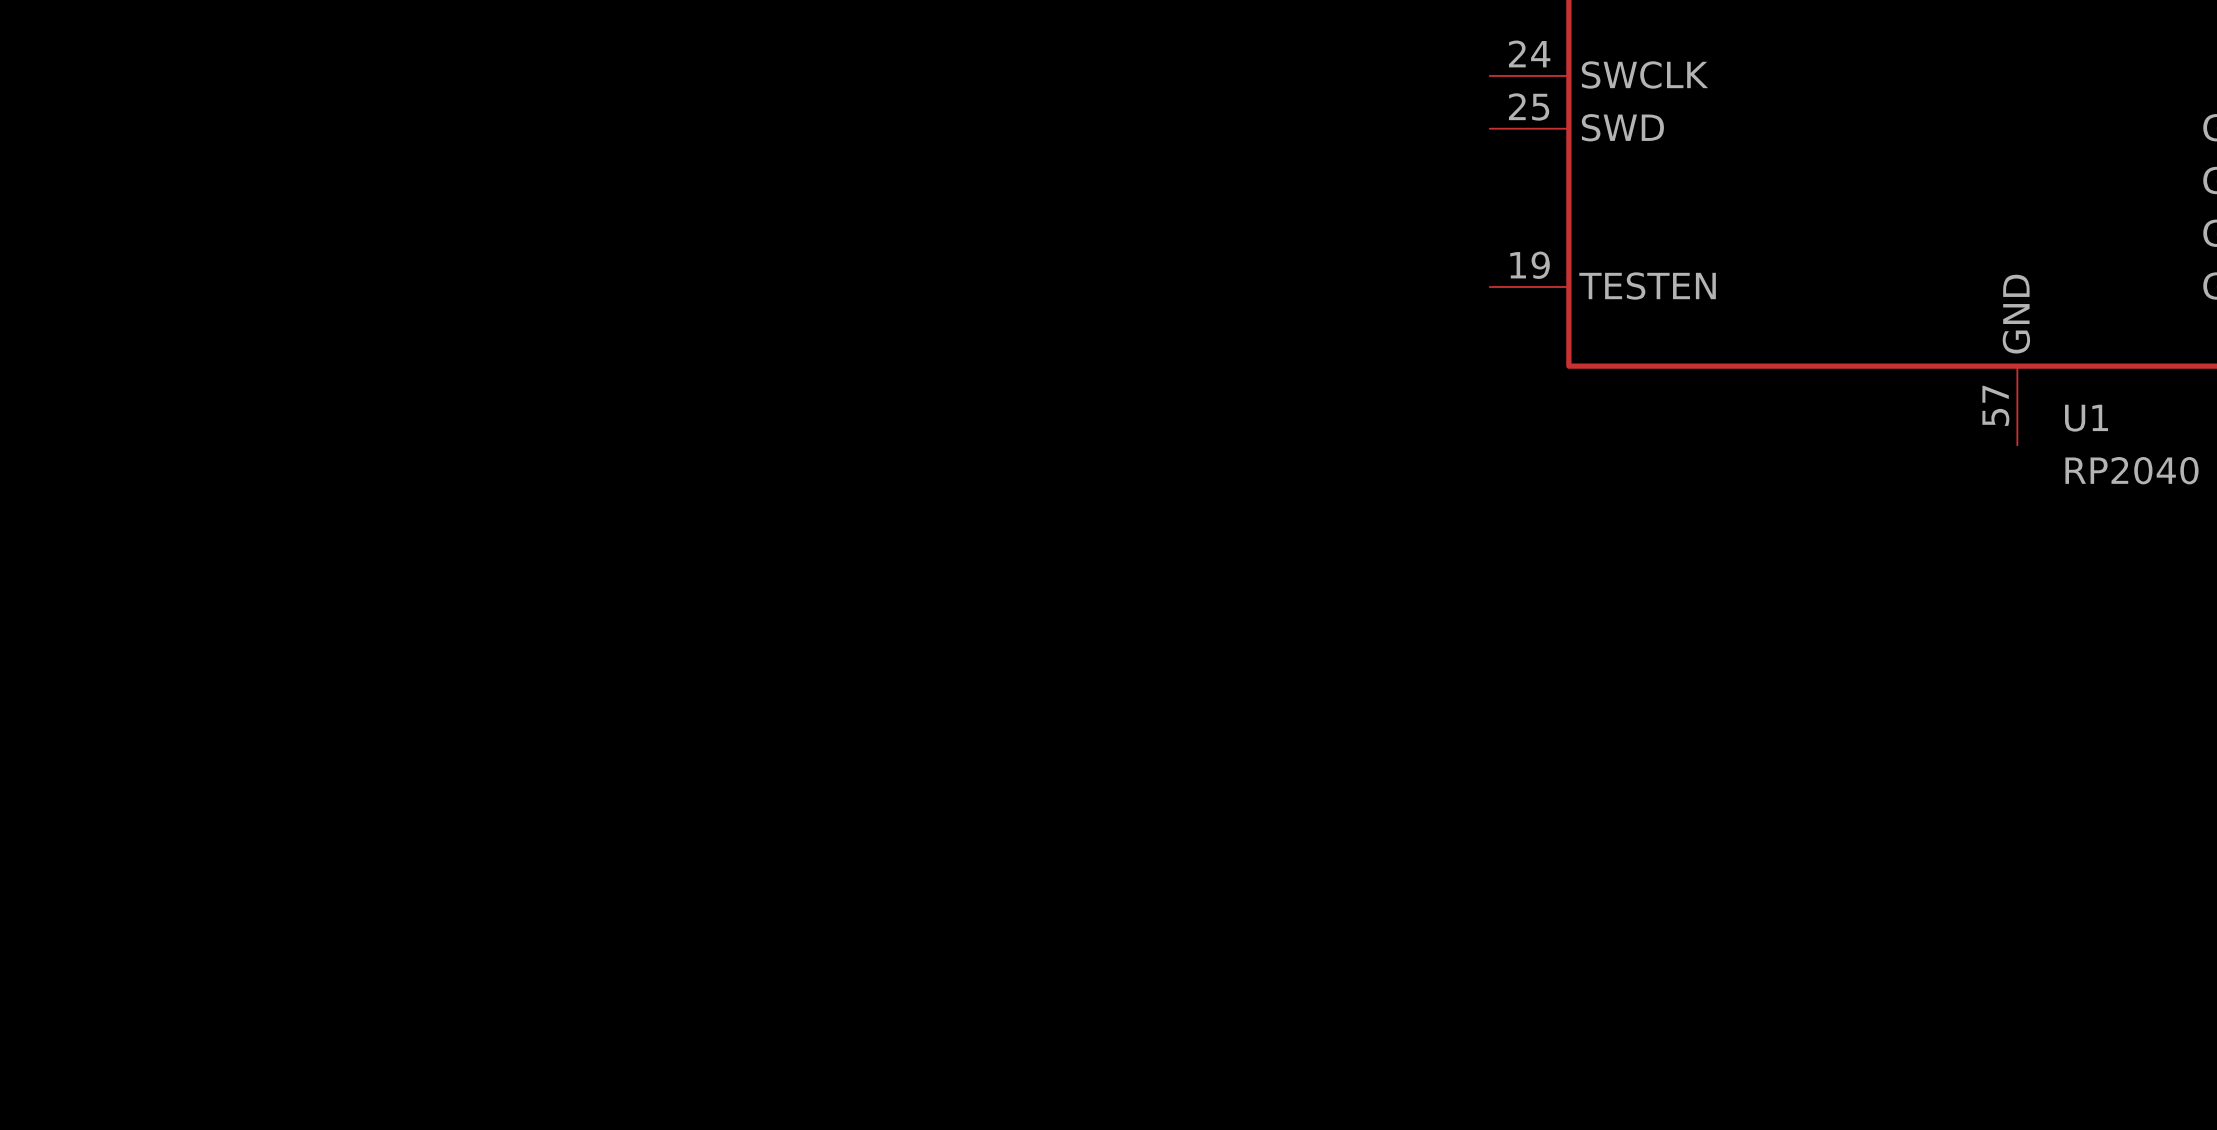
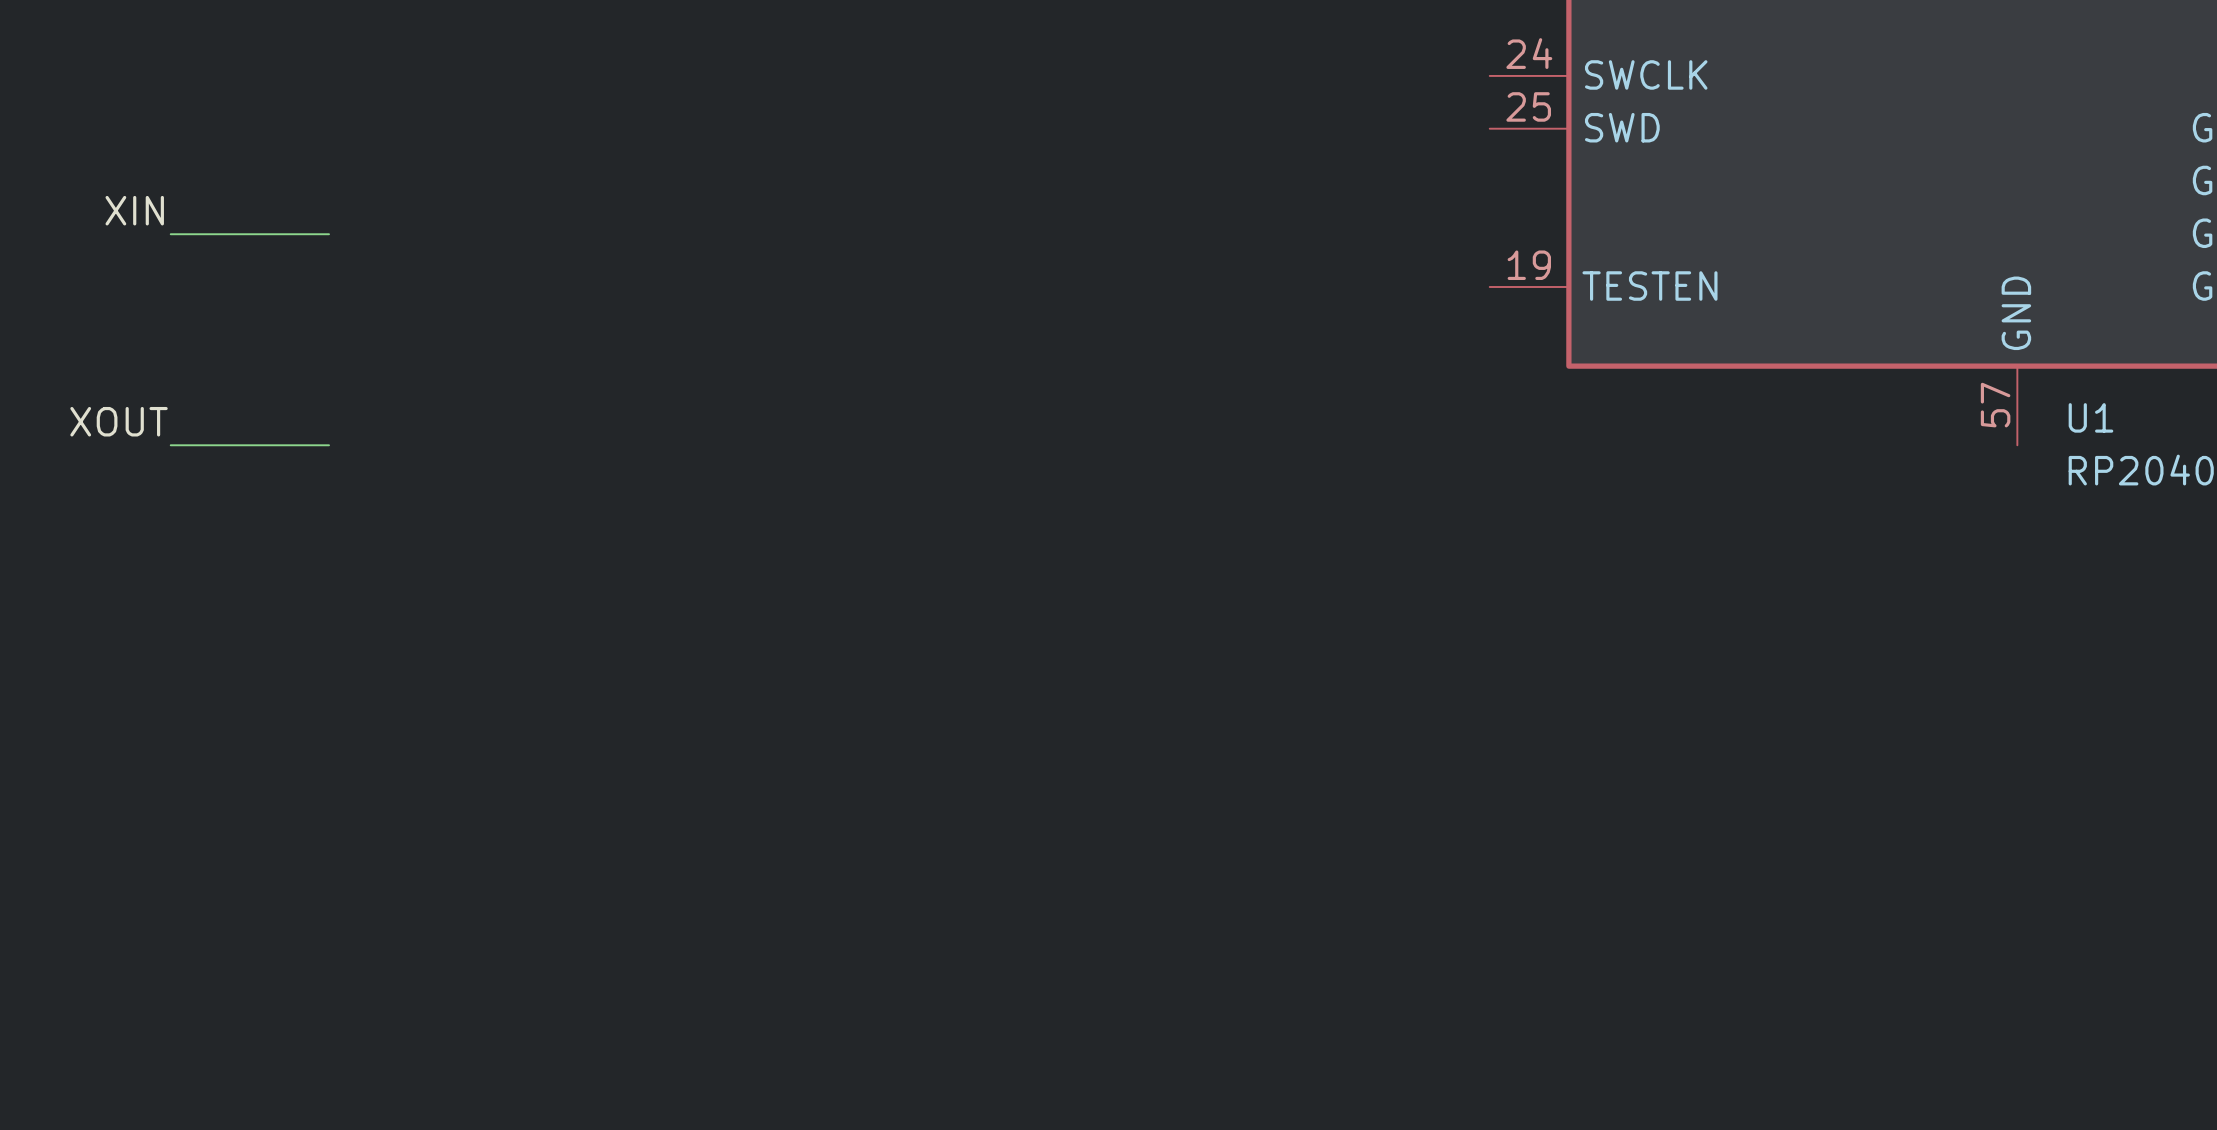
label: none -> XIN (134, 210)
wire: none -> (170, 234) (329, 234)
label: none -> XOUT (119, 421)
wire: none -> (170, 445) (329, 445)

